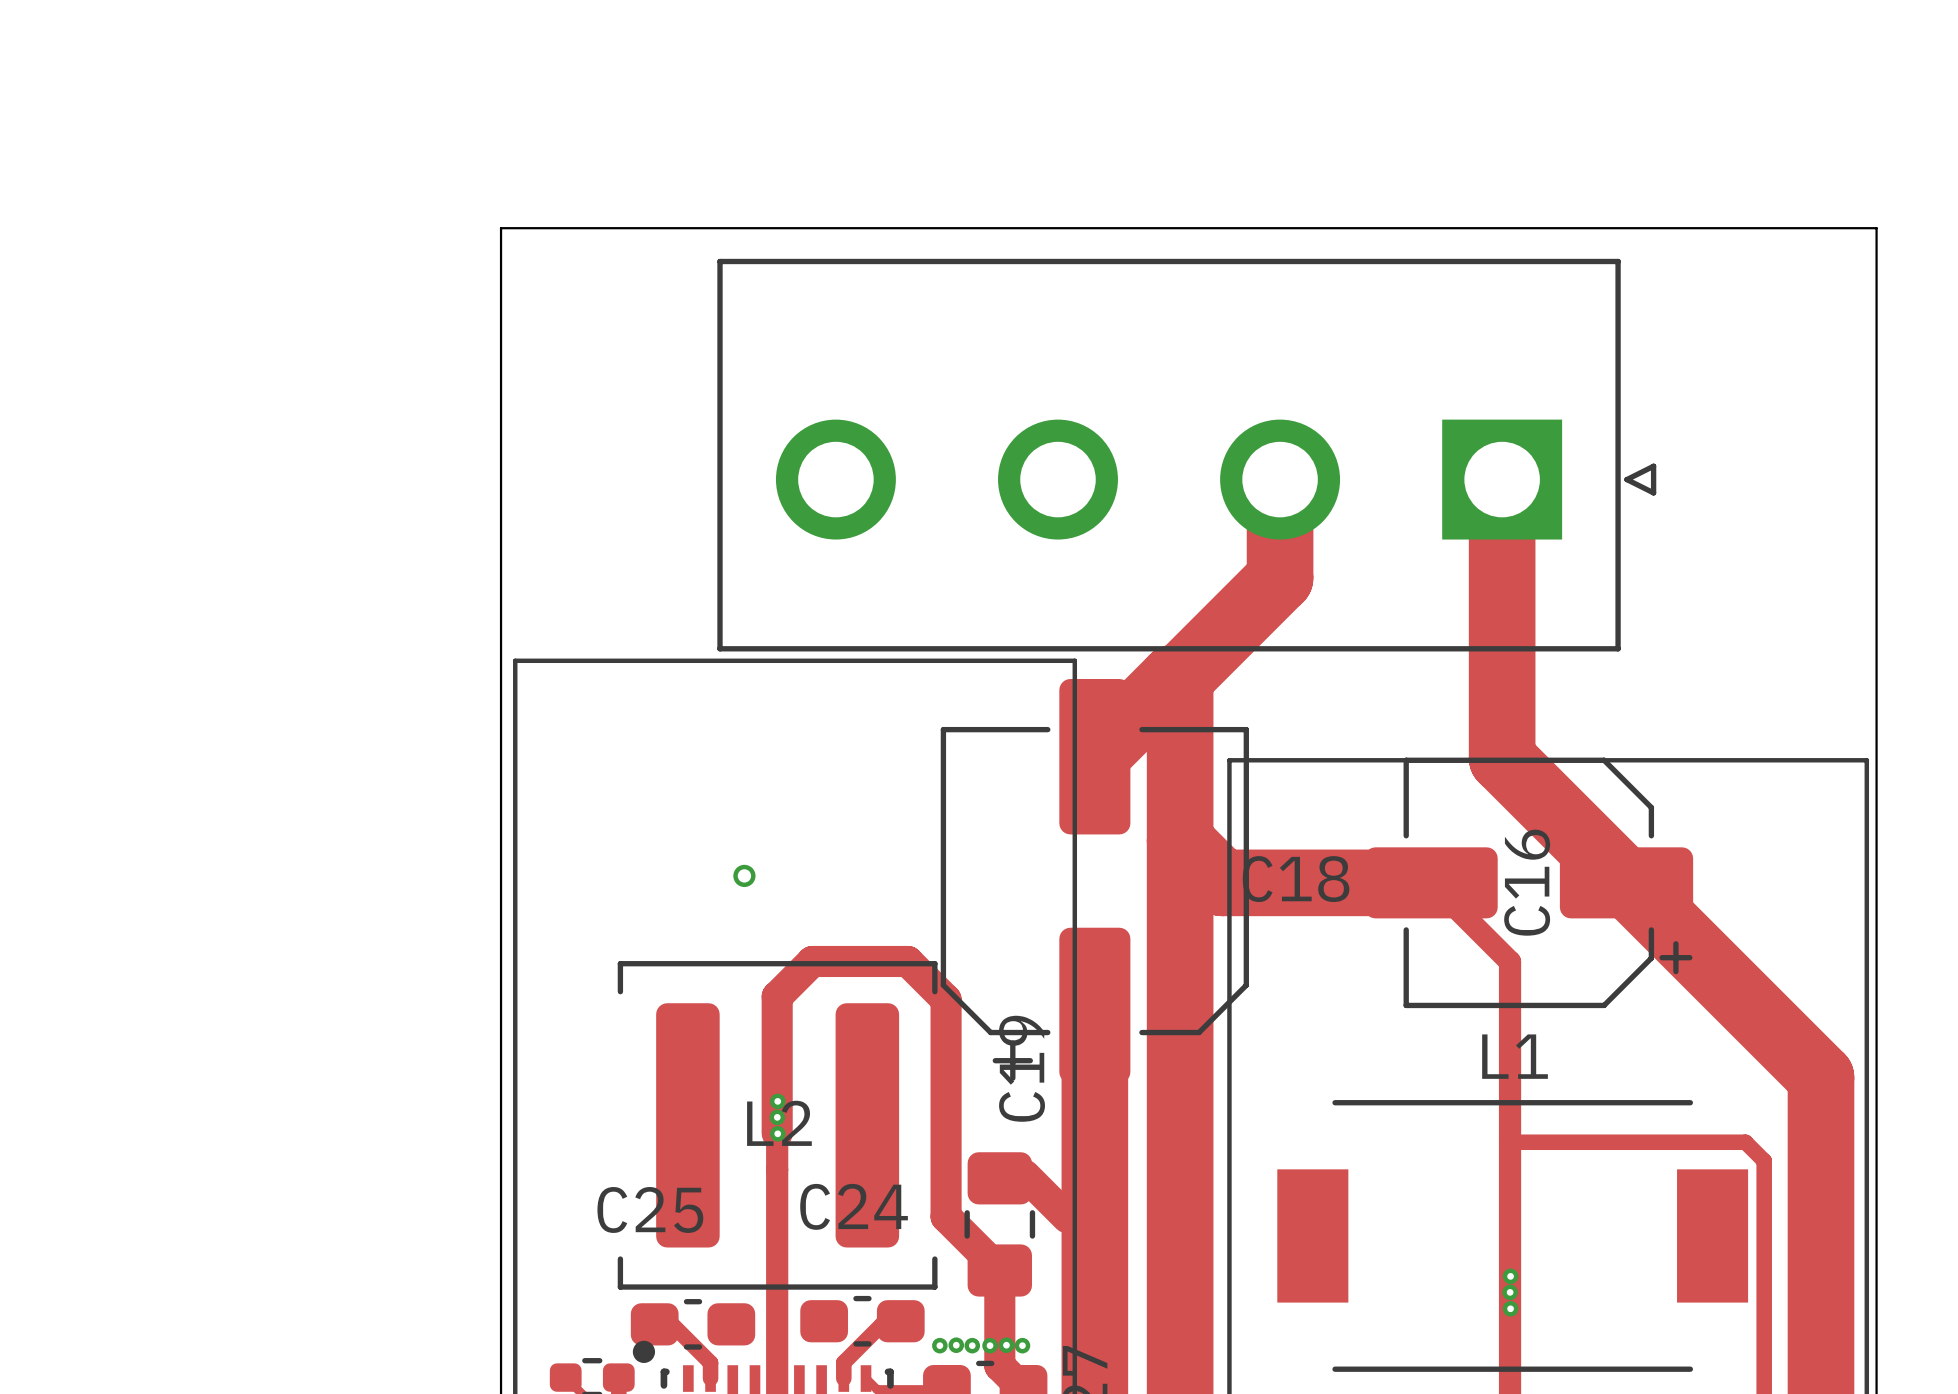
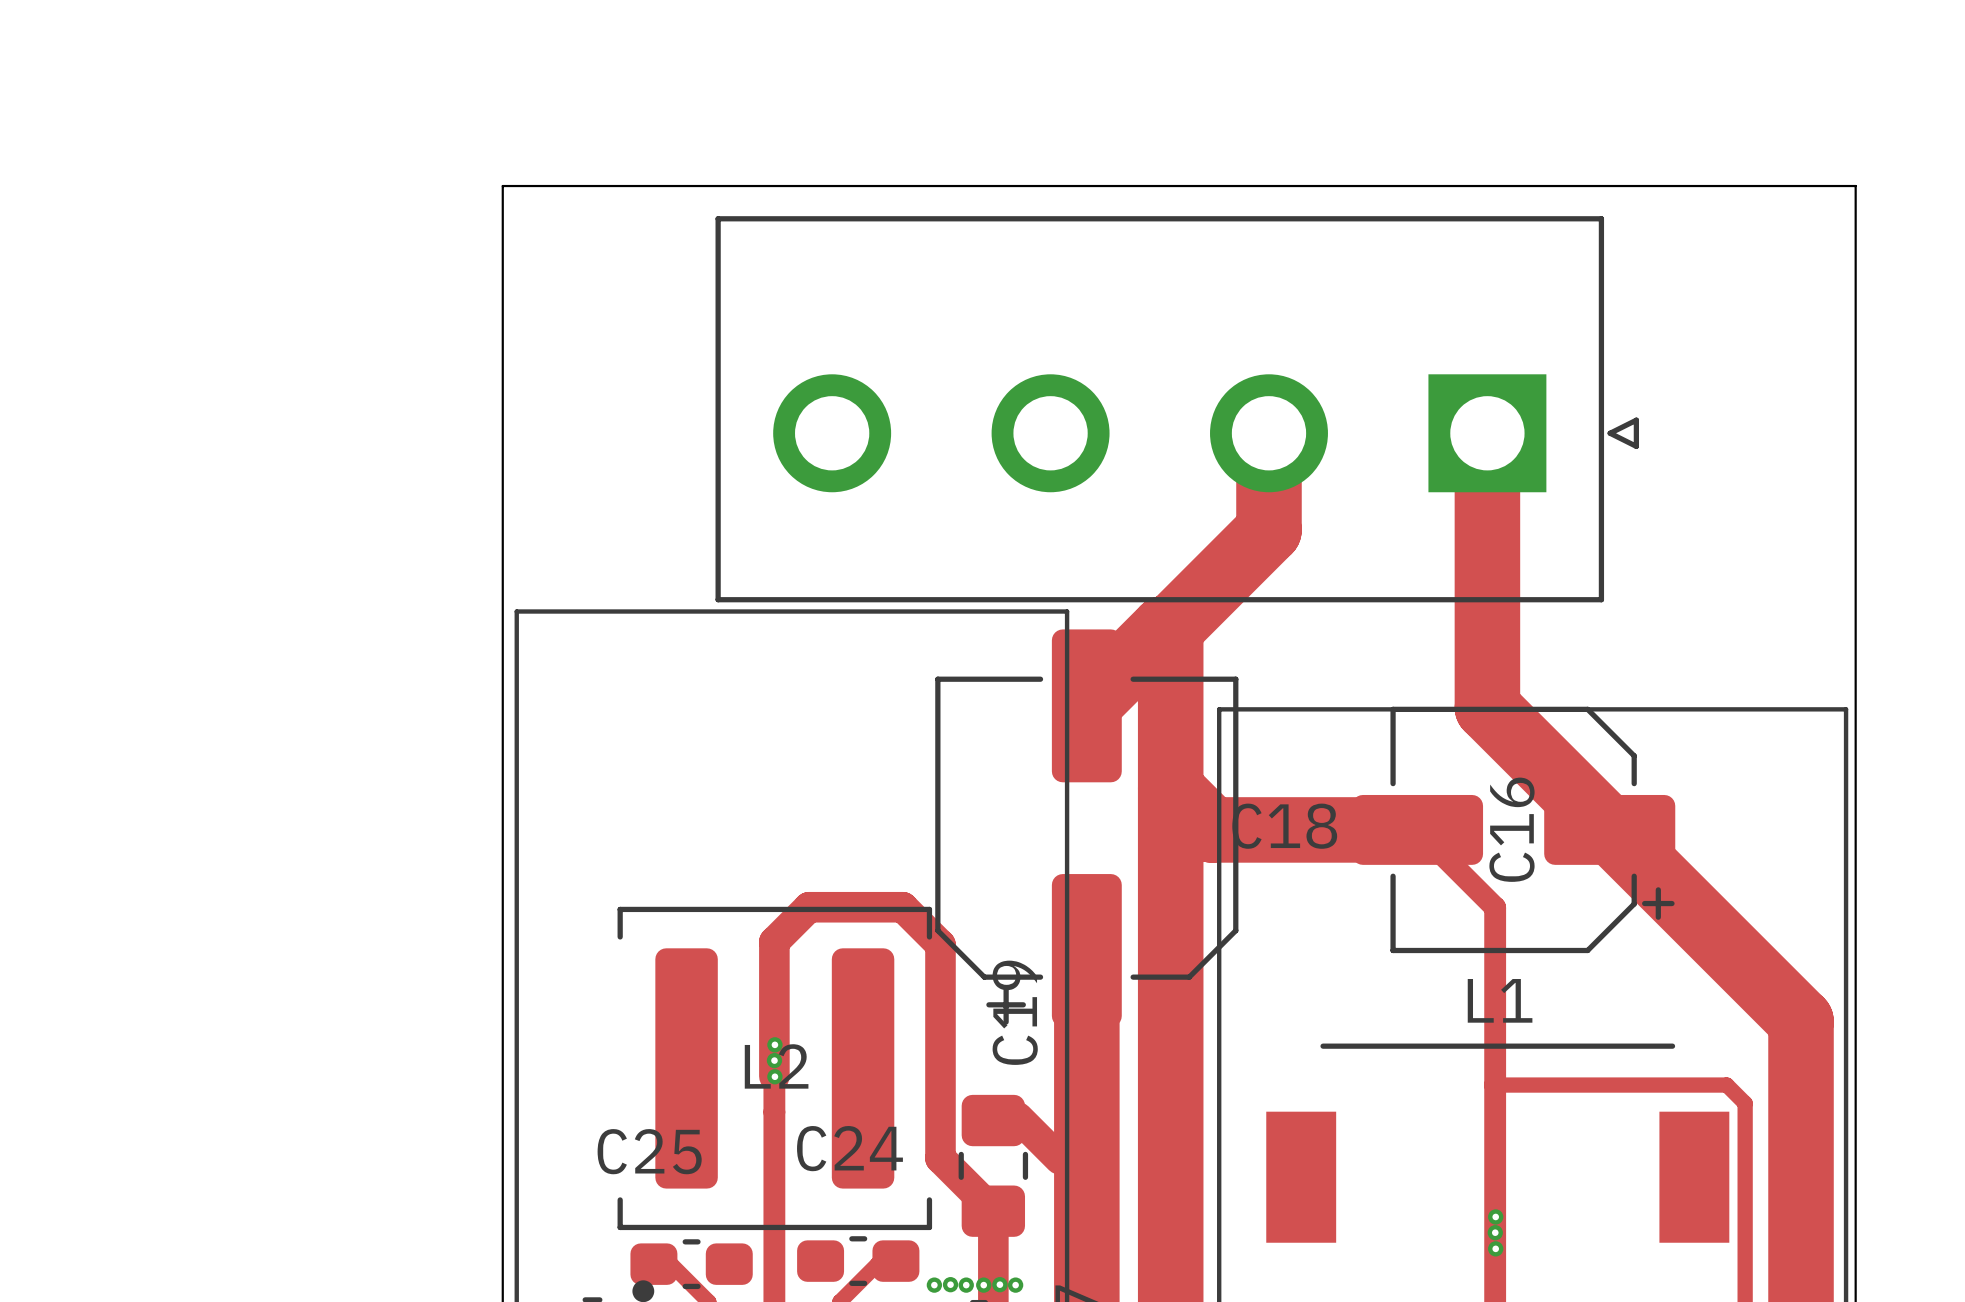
via: (744, 875) -> none

